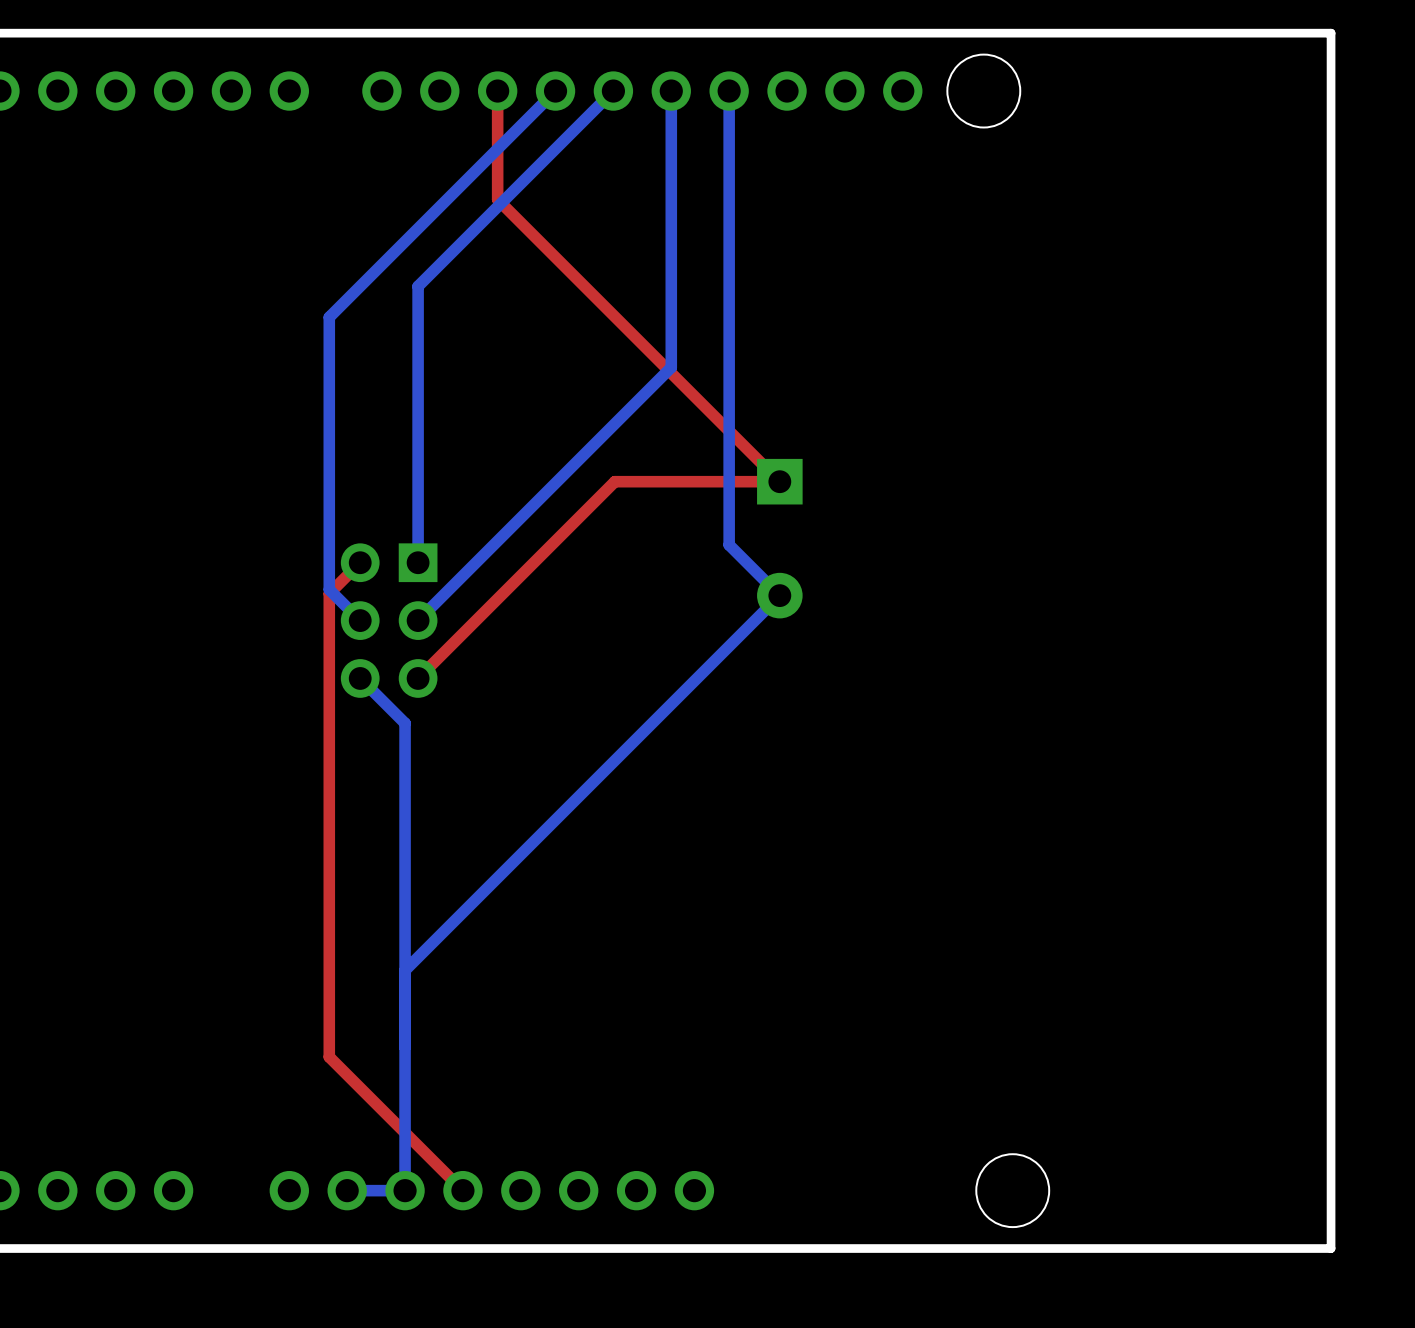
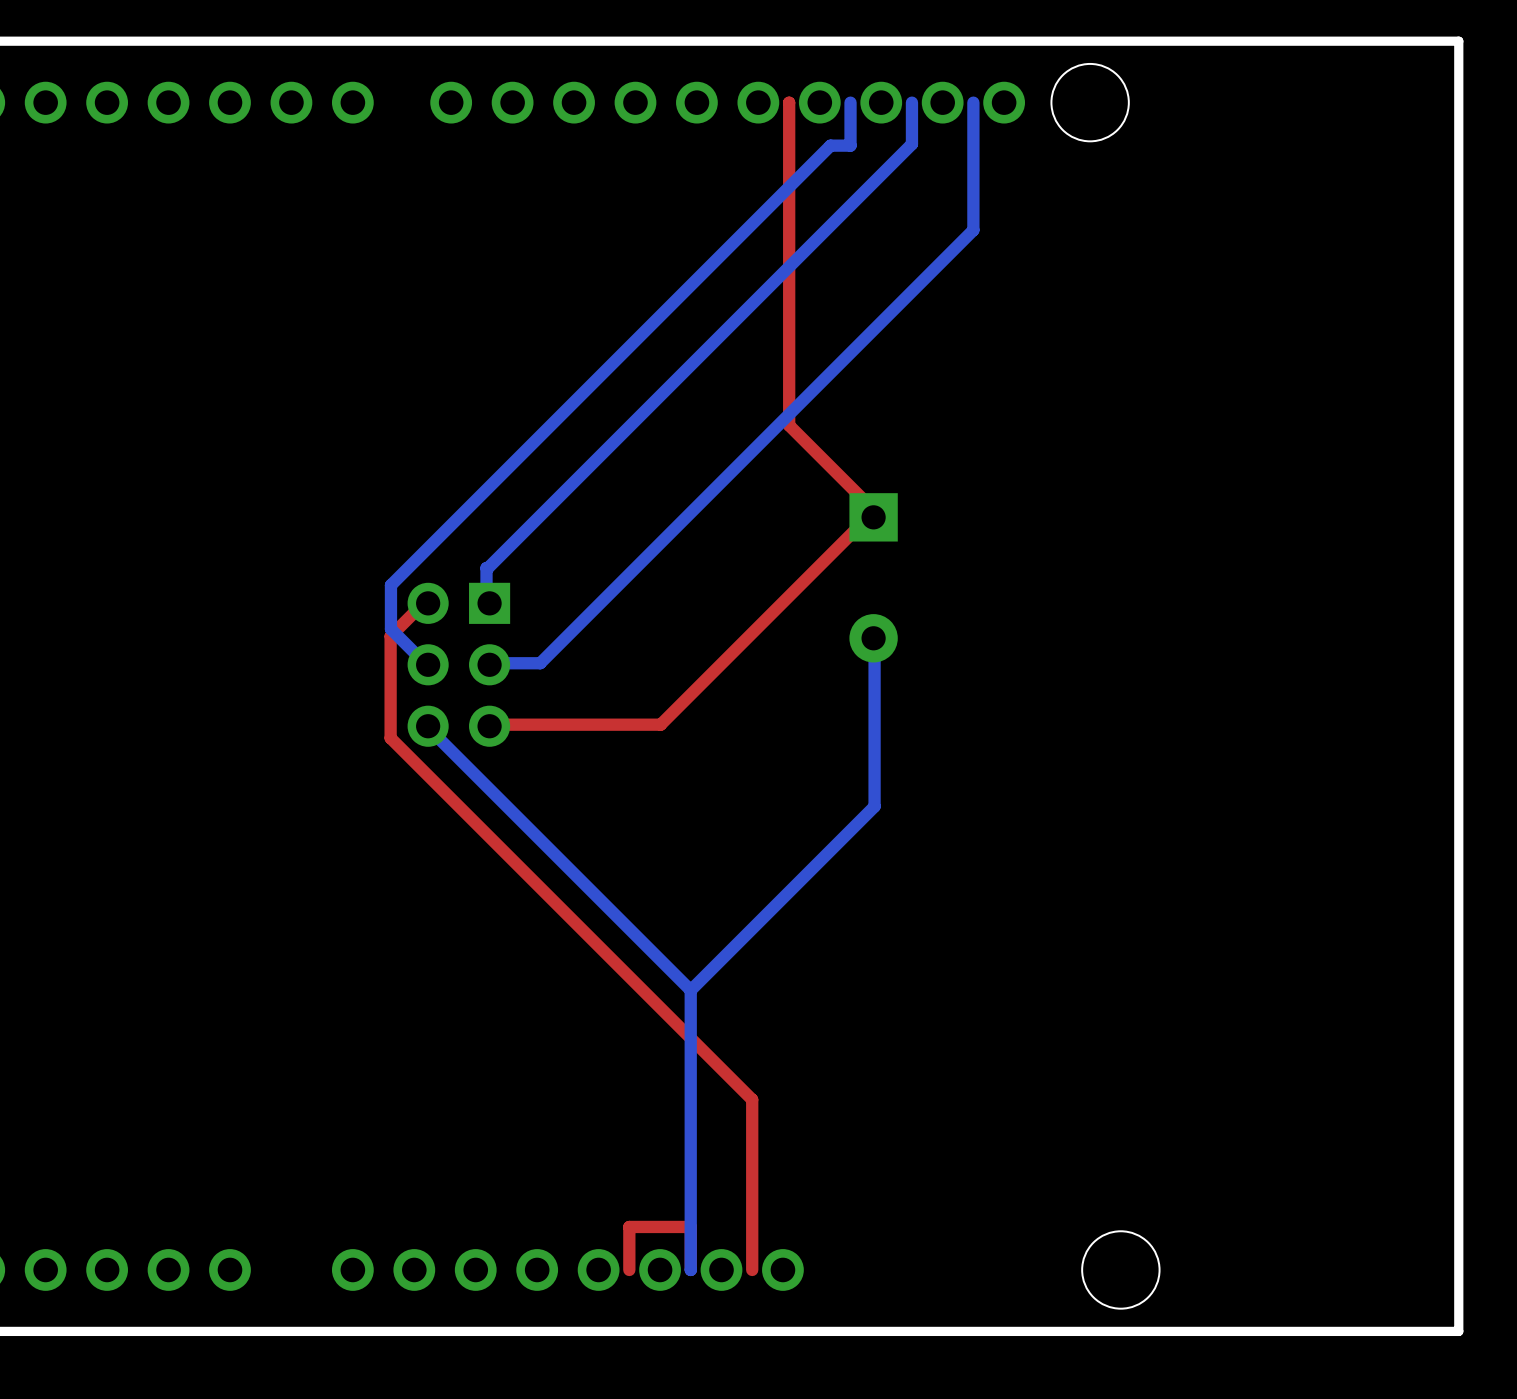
top track: (497, 91) (497, 199) (779, 481) (614, 481) (418, 678) -> none
bottom track: (555, 91) (329, 317) (329, 589) (360, 620) -> none
bottom track: (613, 91) (418, 286) (418, 562) -> none
bottom track: (671, 91) (671, 367) (418, 620) -> none
top track: none -> (789, 102) (789, 425) (874, 510) (660, 724) (496, 724)
bottom track: (729, 91) (729, 544) (779, 595) (405, 970) -> none
bottom track: none -> (850, 102) (850, 145) (830, 145) (390, 585) (390, 629) (425, 663)
bottom track: none -> (911, 102) (911, 144) (486, 568) (486, 601)
bottom track: none -> (973, 102) (973, 230) (540, 663) (486, 663)
top track: none -> (425, 601) (390, 636) (390, 738) (752, 1099) (752, 1269)
top track: (360, 562) (329, 593) (329, 1056) (462, 1190) -> none
bottom track: none -> (874, 633) (874, 806) (690, 990)
bottom track: none -> (425, 724) (690, 990)
bottom track: (360, 678) (405, 723) (405, 1190) (347, 1190) -> none
bottom track: none -> (690, 990) (690, 1269)
top track: none -> (690, 1269) (690, 1226) (629, 1226) (629, 1269)

